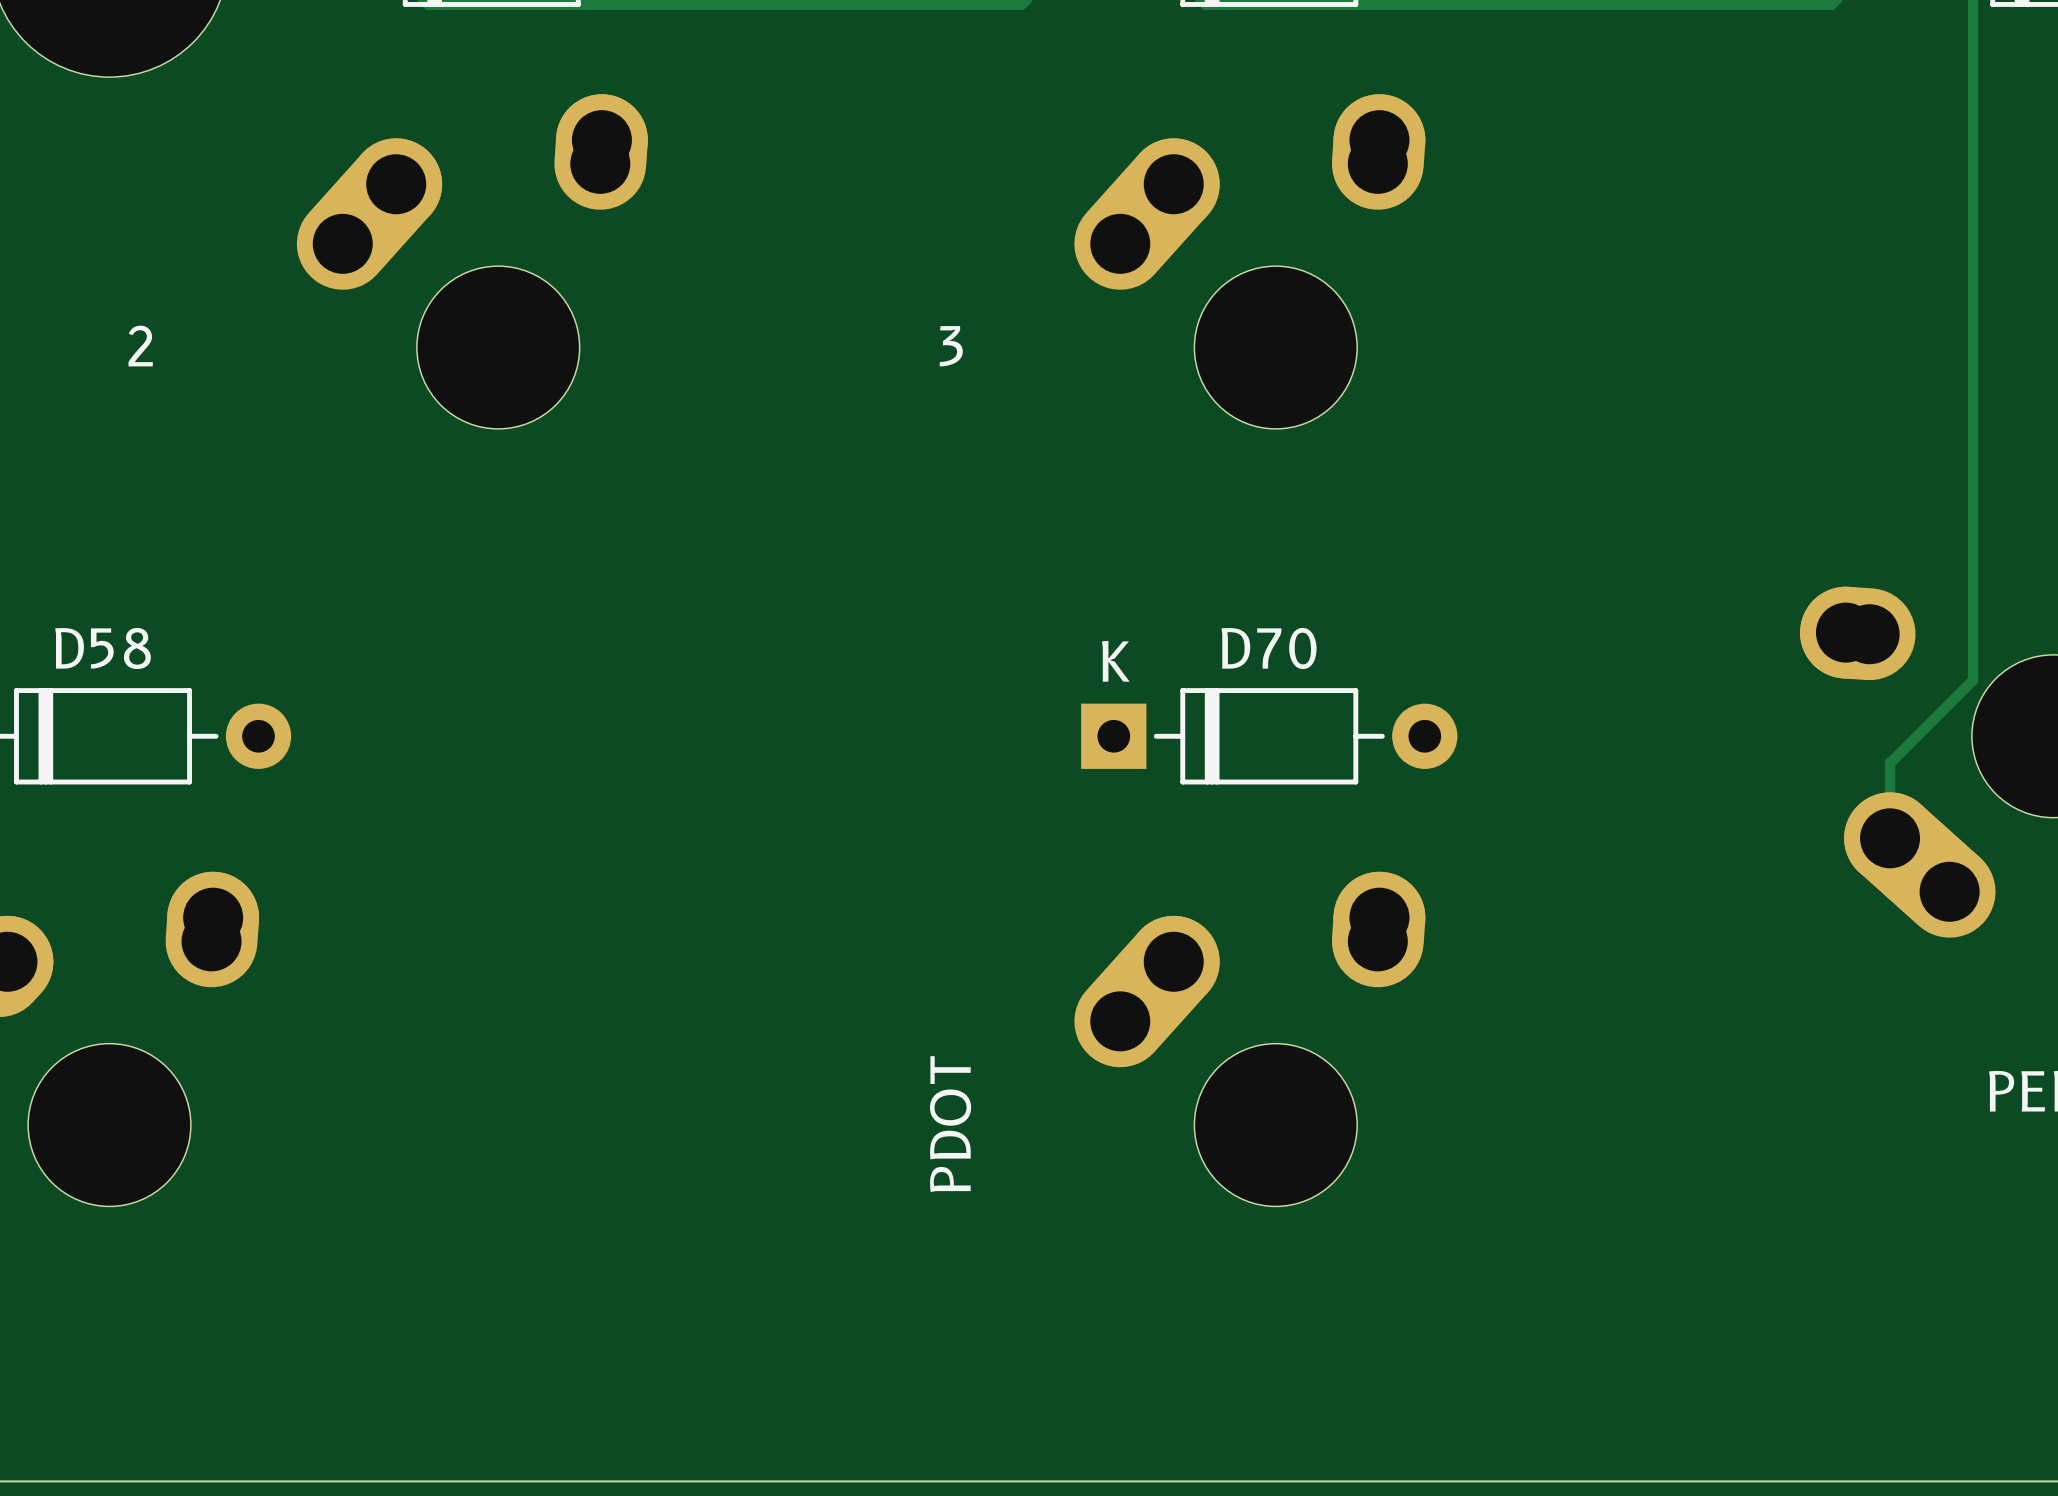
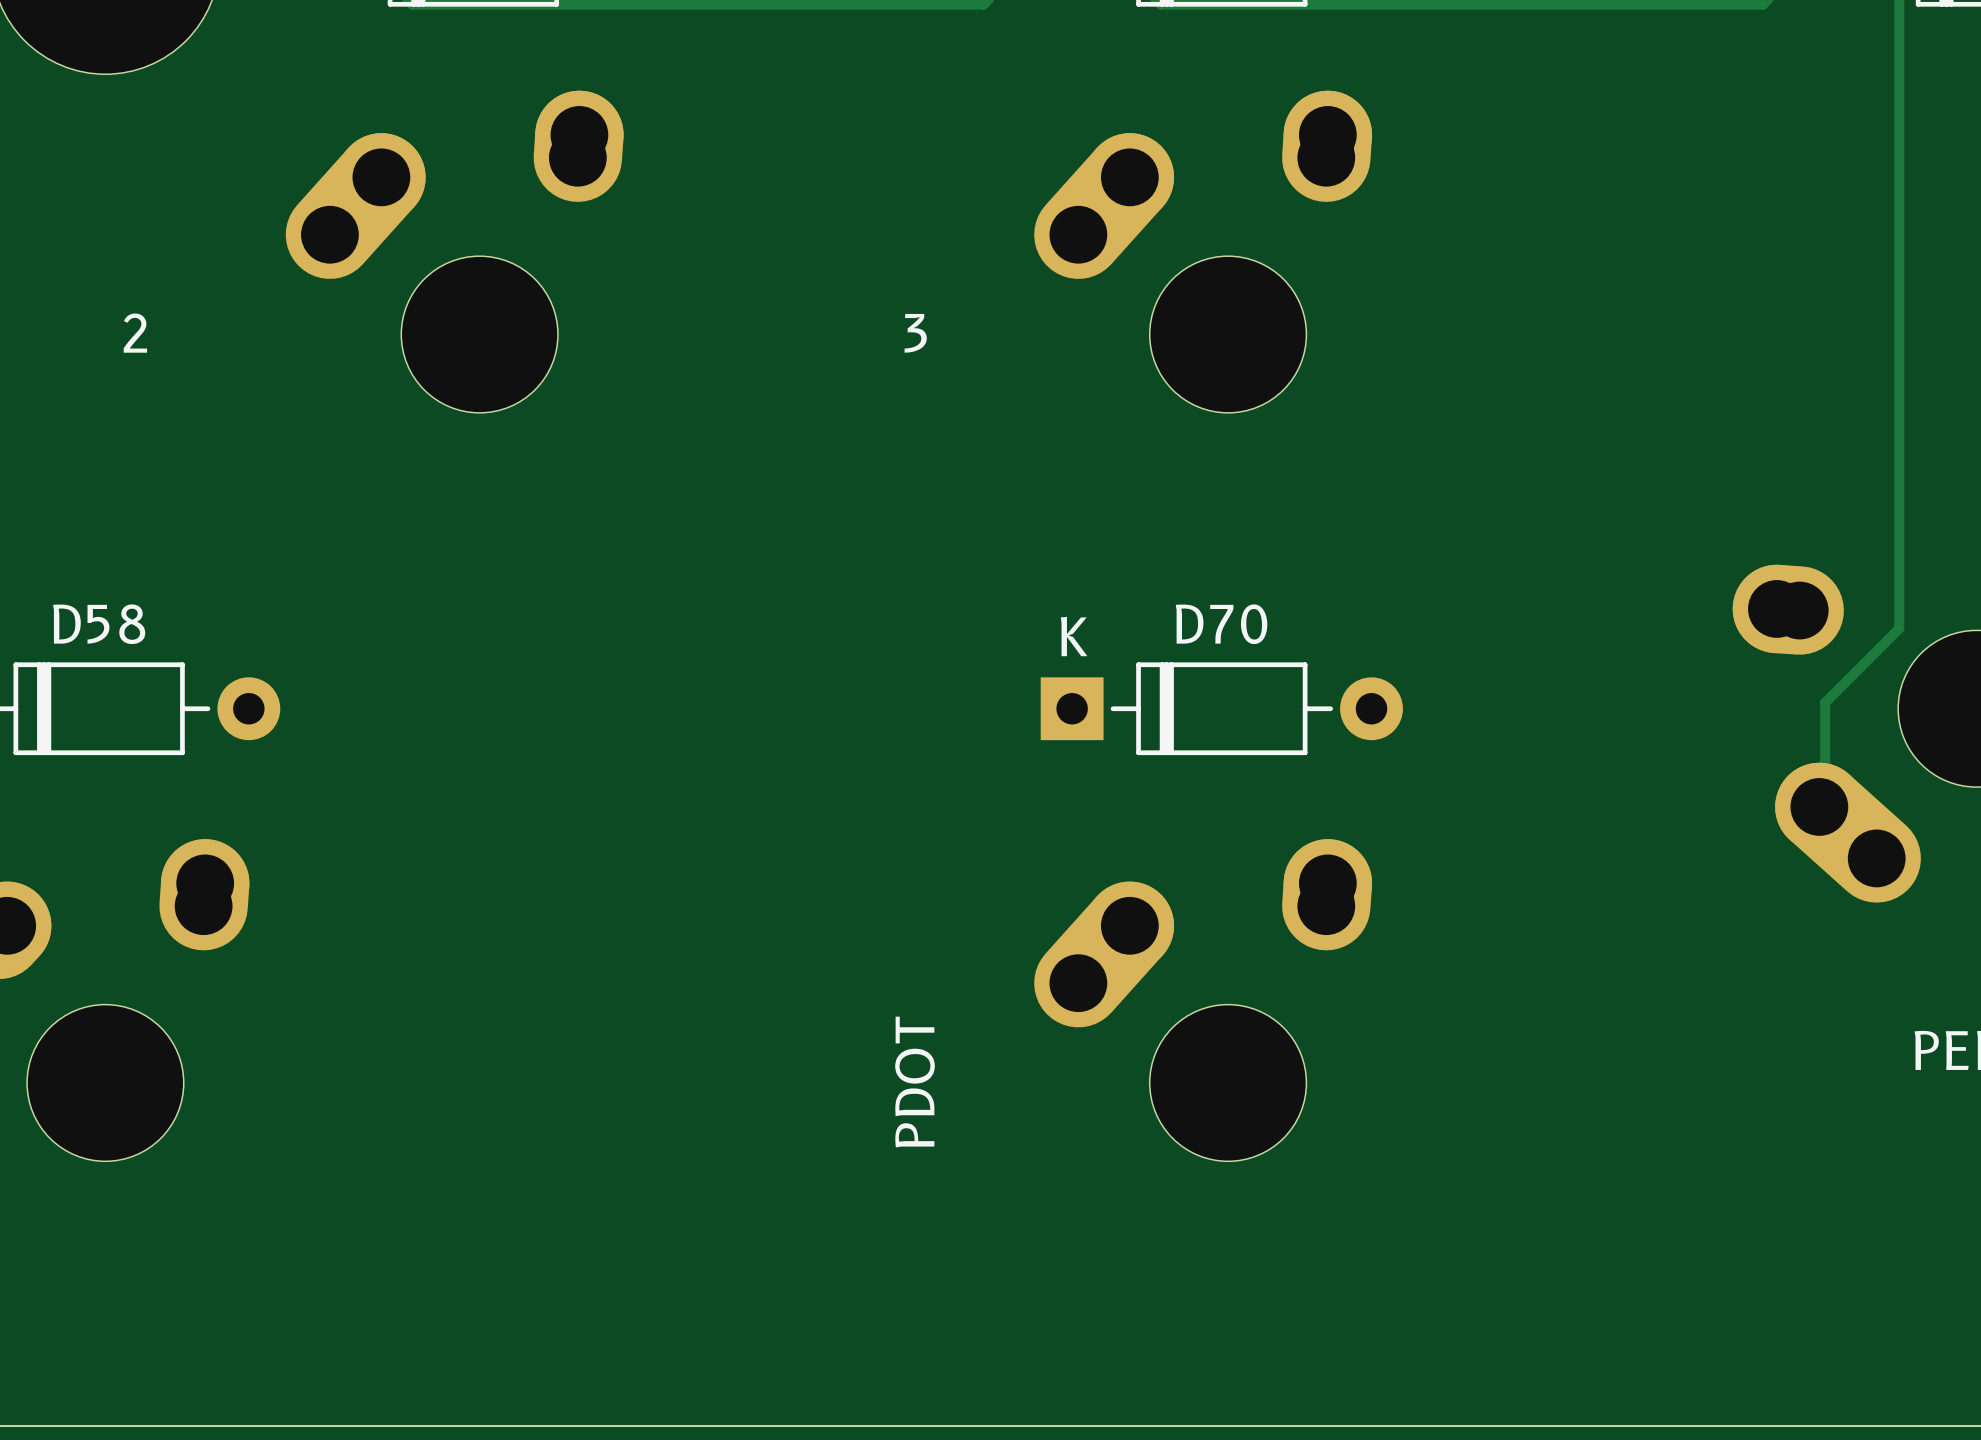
track: (1973, 652) (1973, 680) (1890, 763) (1890, 838) -> (1899, 628) (1825, 702) (1825, 806) (1876, 858)

